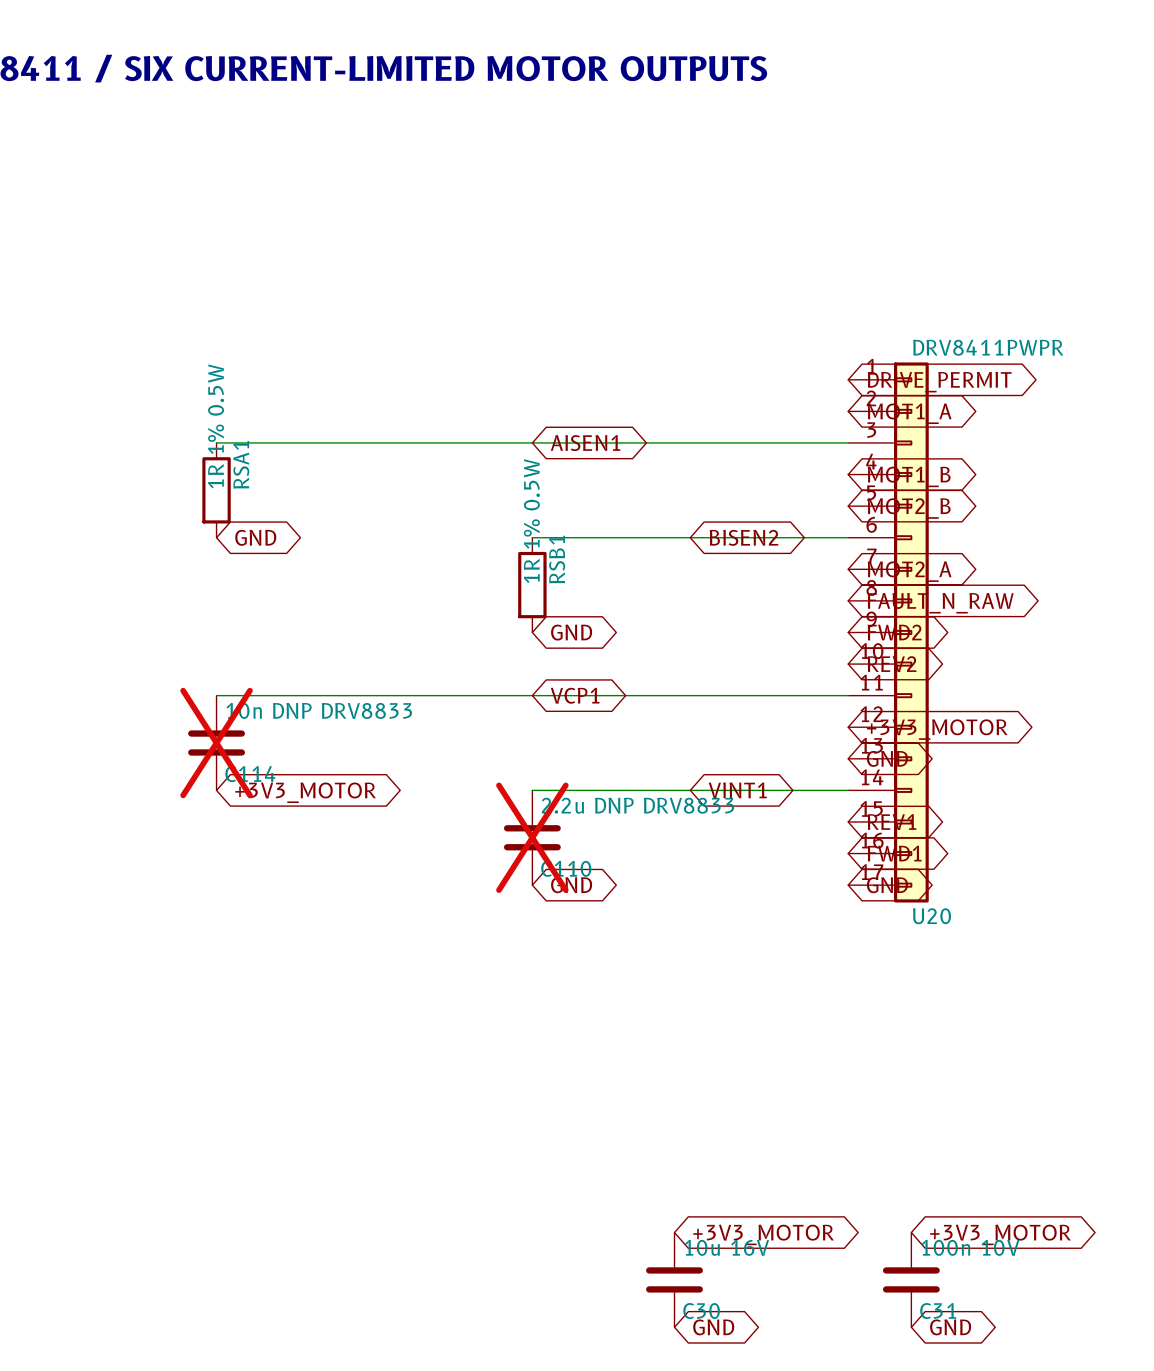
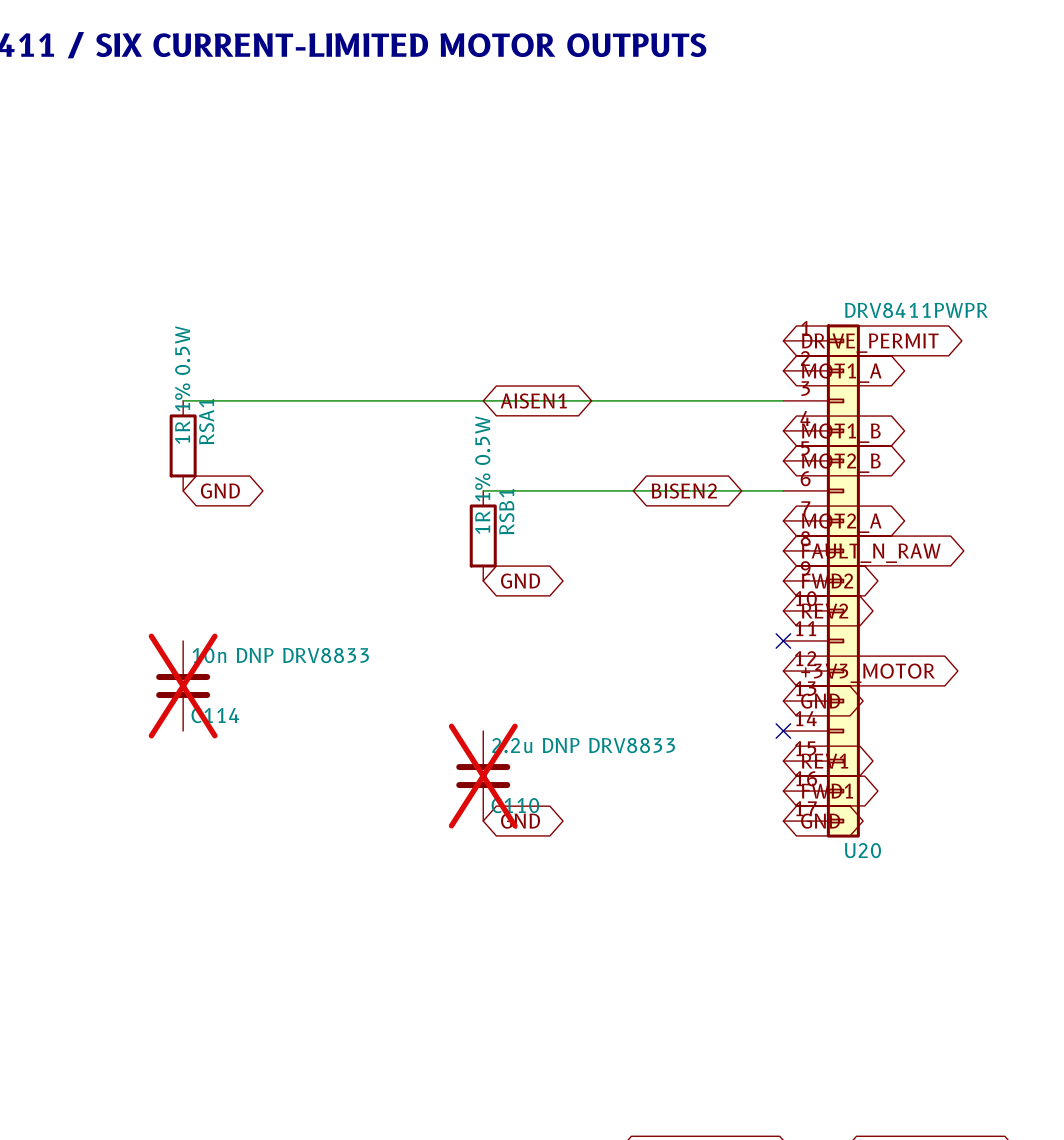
wire: (216, 695) (848, 695) -> none
global label: VCP1 (575, 695) -> none
no-connect mark: none -> (783, 641)
wire: (532, 790) (848, 790) -> none
global label: VINT1 (737, 790) -> none
no-connect mark: none -> (783, 731)
global label: +3V3_MOTOR (305, 792) -> none

